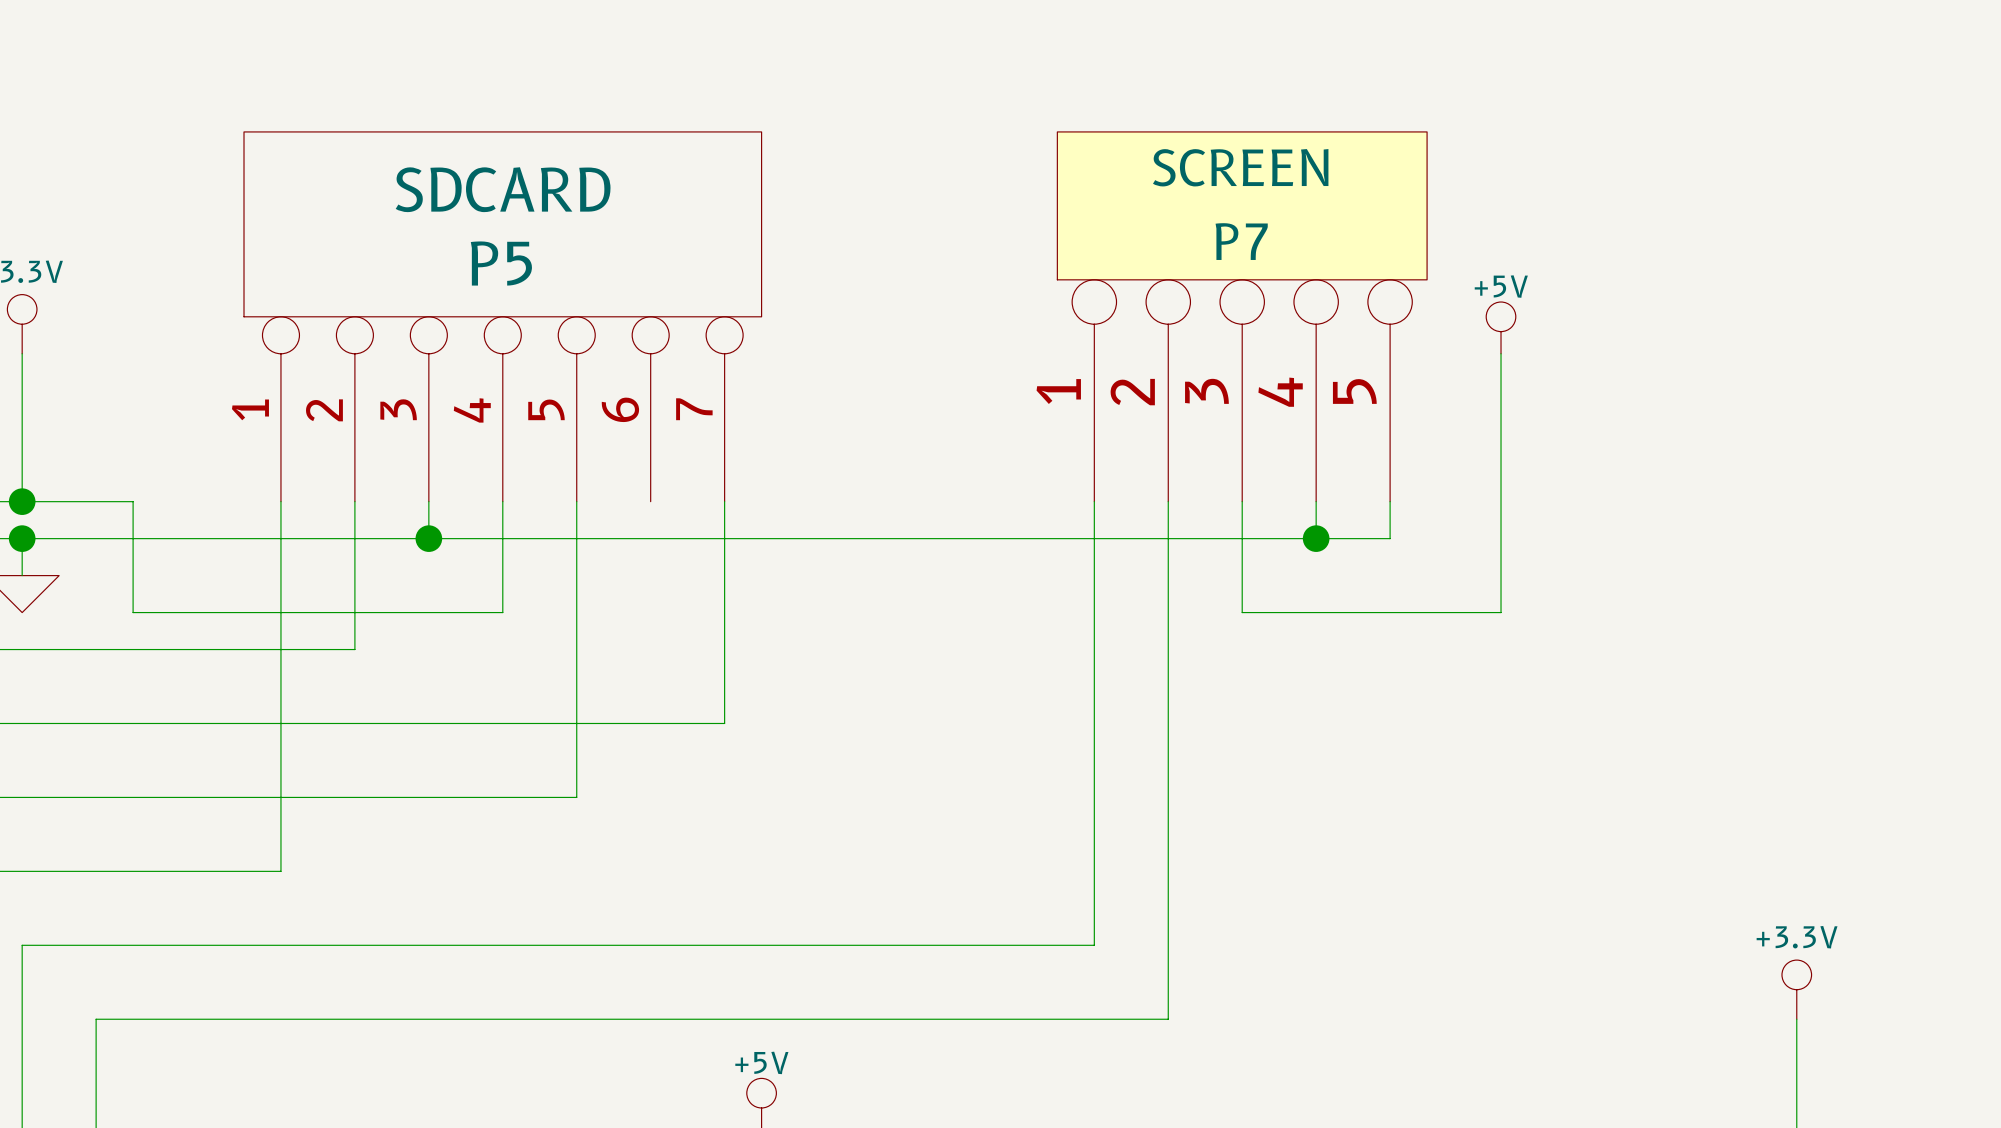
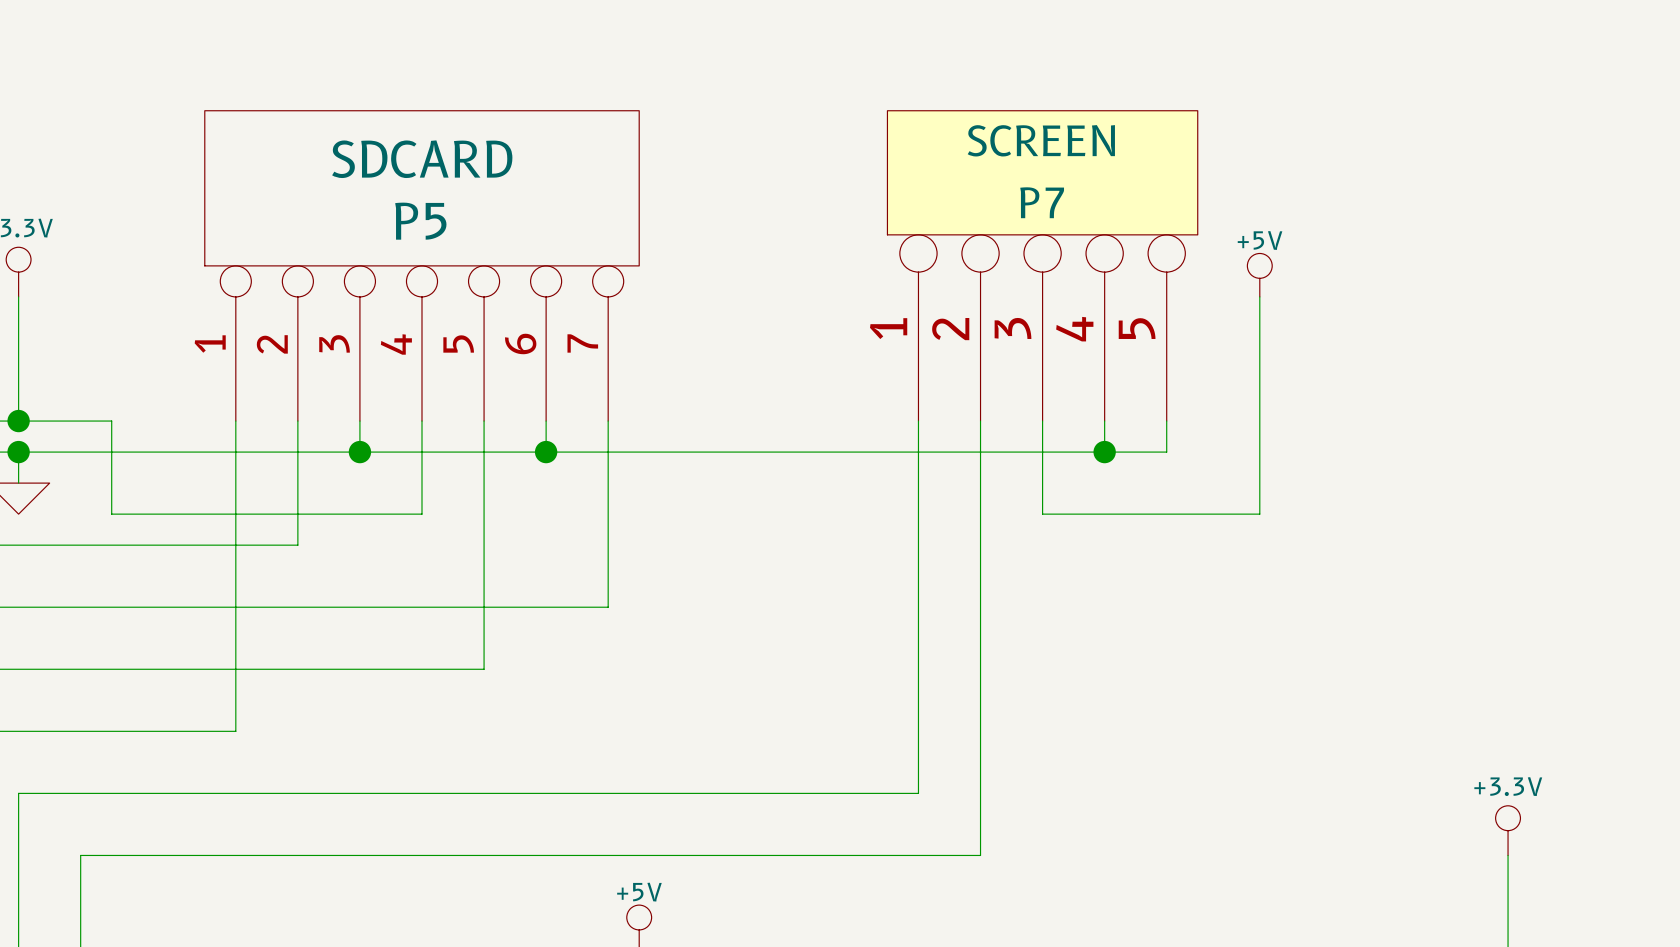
wire: none -> (546, 421) (546, 452)
junction: none -> (546, 452)

